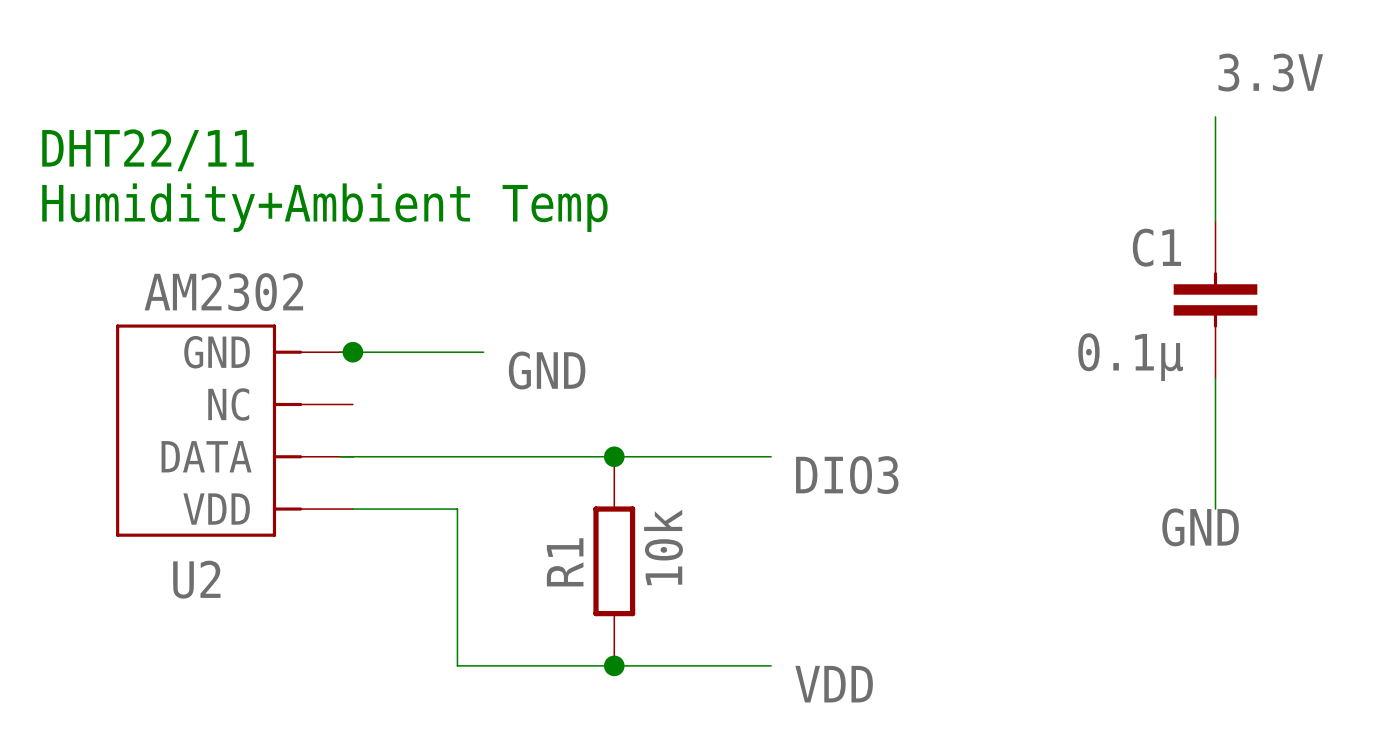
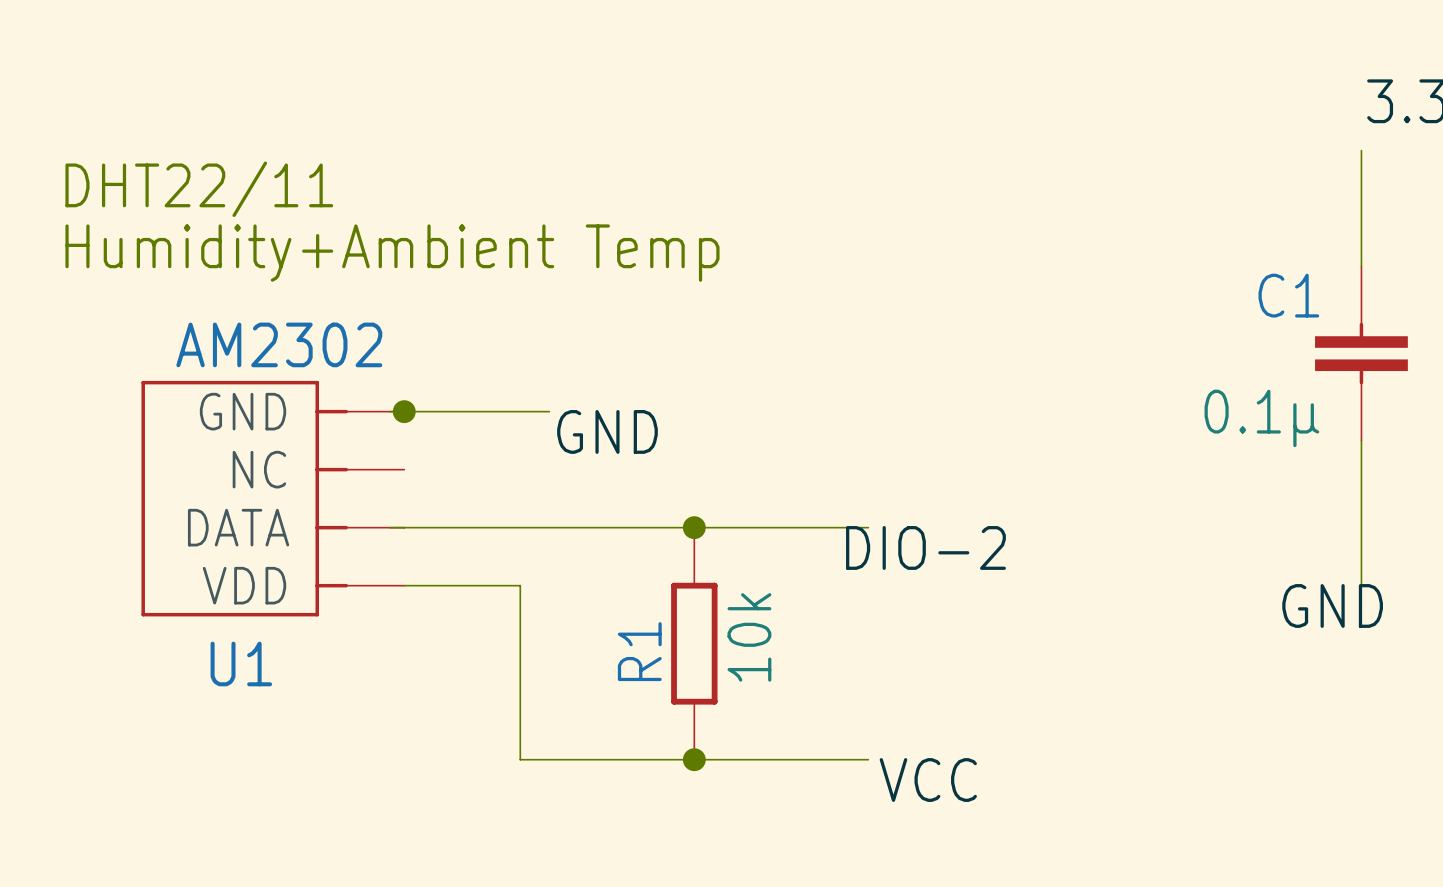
label: DIO3 (847, 475) -> DIO-2 (925, 547)
U2 name: U2 (196, 579) -> U1 (241, 663)
label: VDD (834, 684) -> VCC (928, 780)

